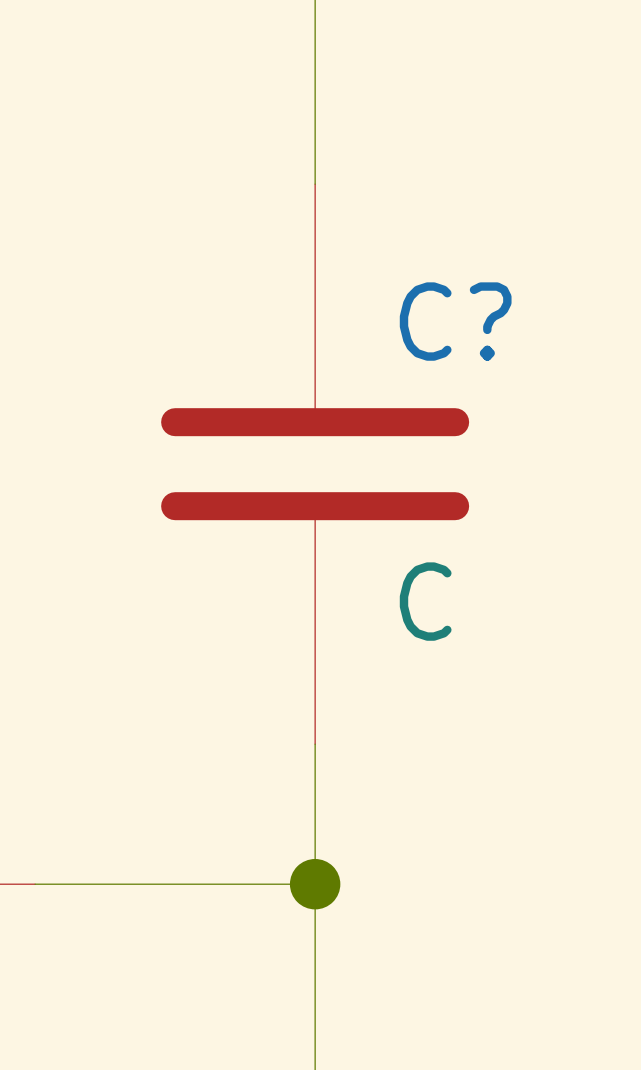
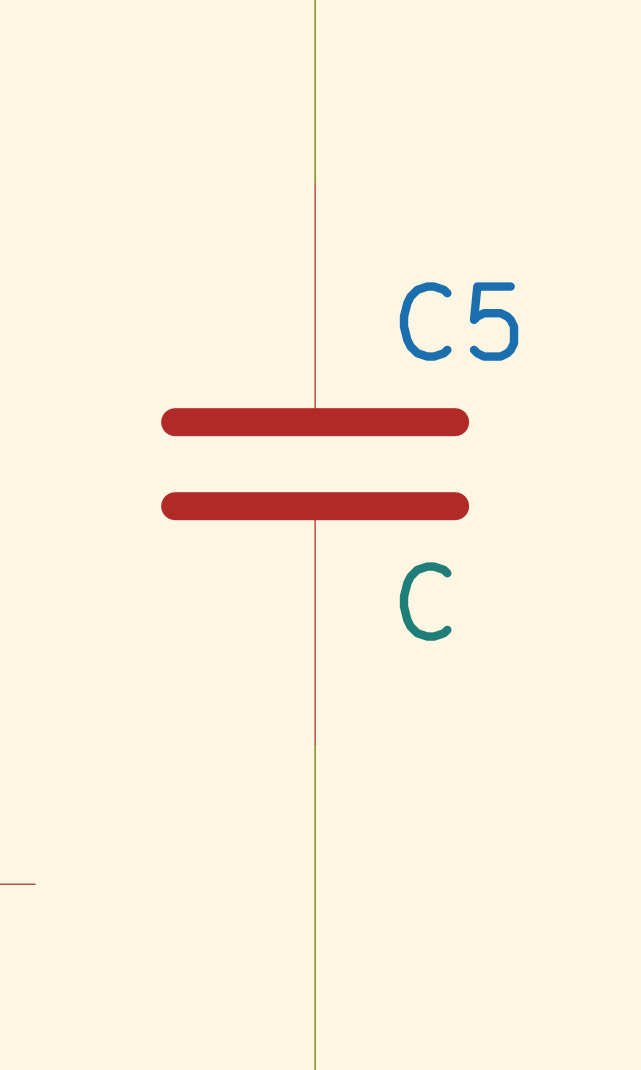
C? name: C? (455, 321) -> C5 (459, 321)
wire: (35, 884) (315, 884) -> none
junction: (315, 884) -> none

